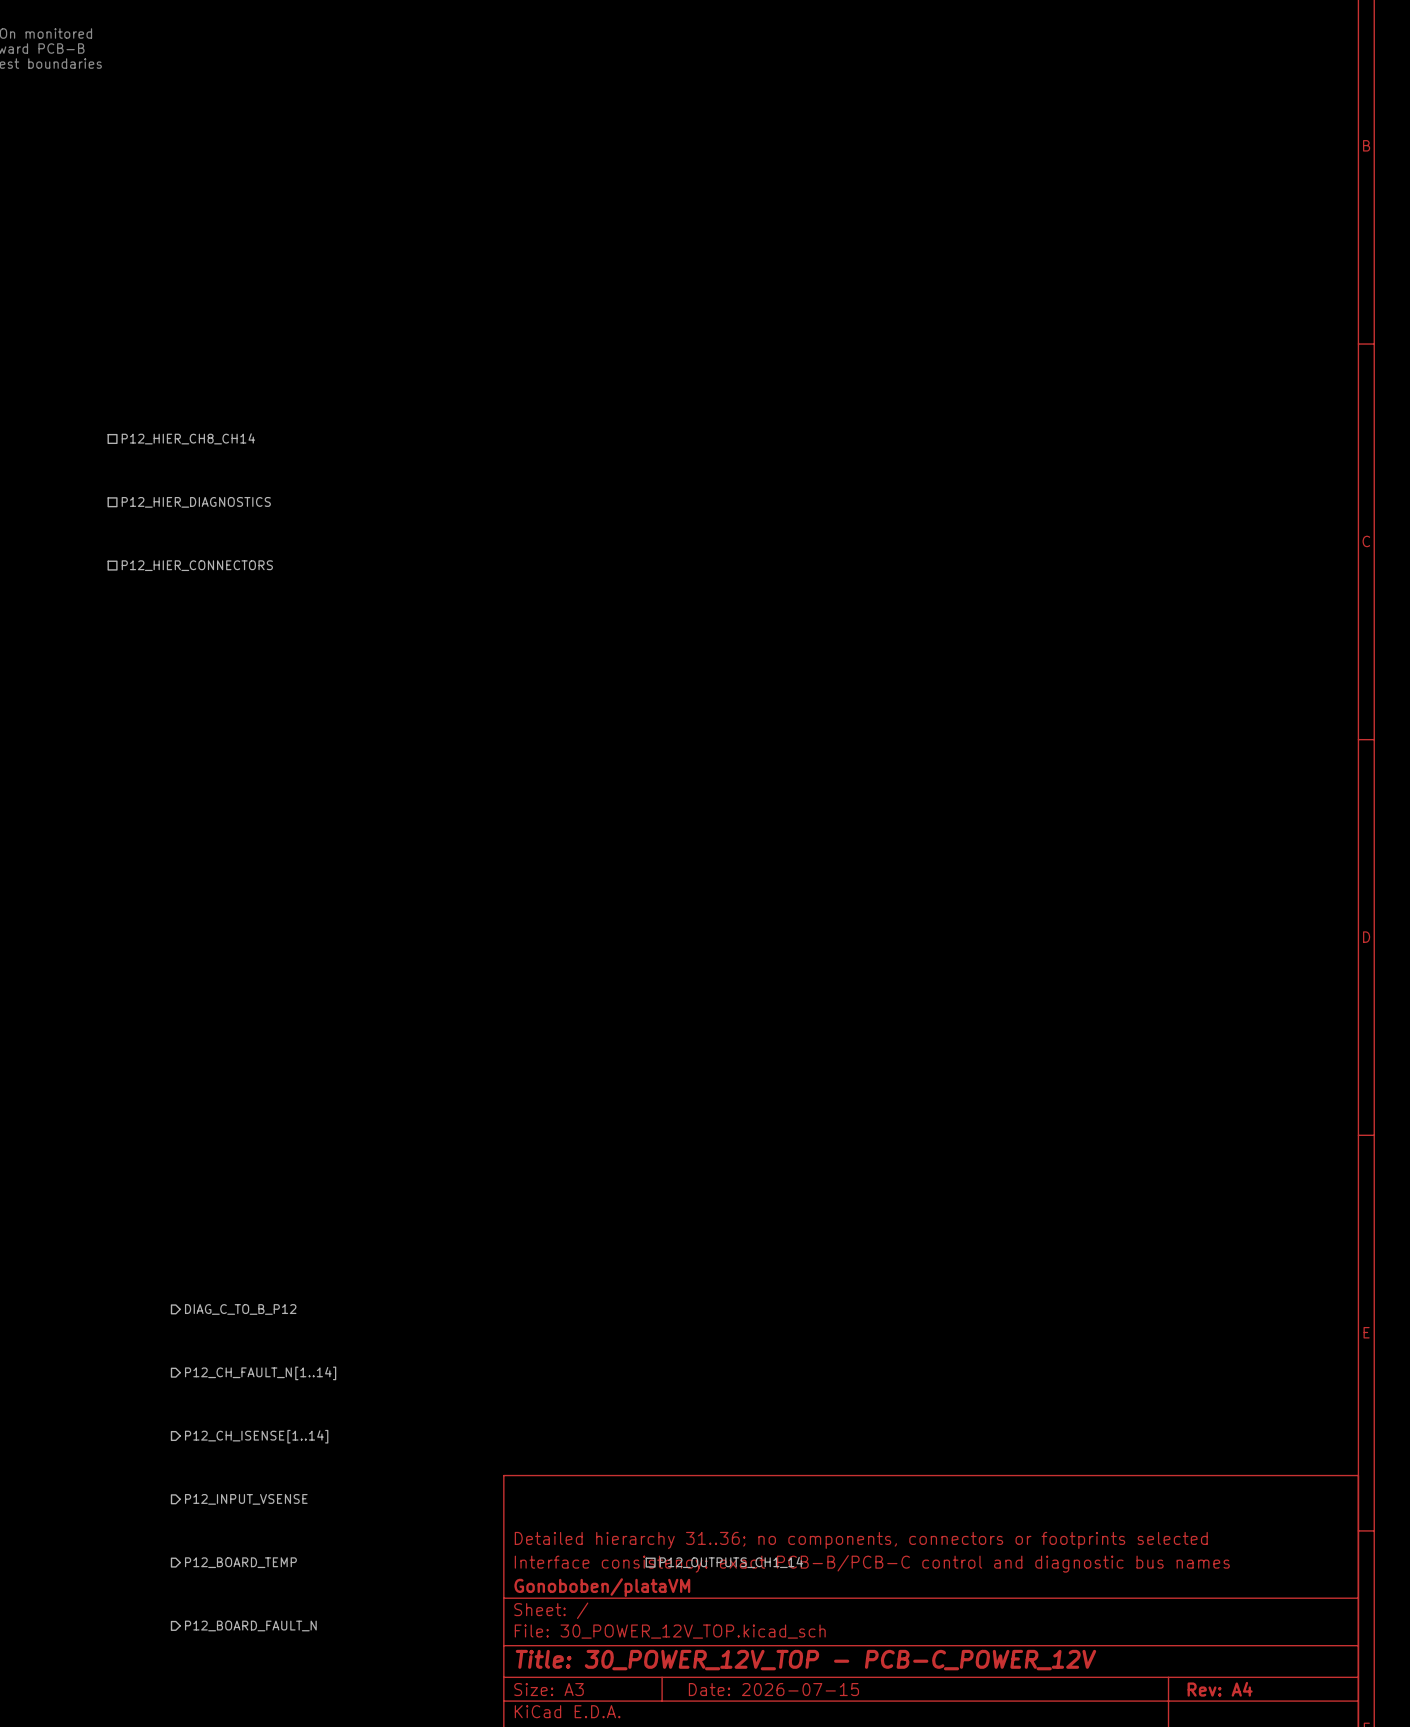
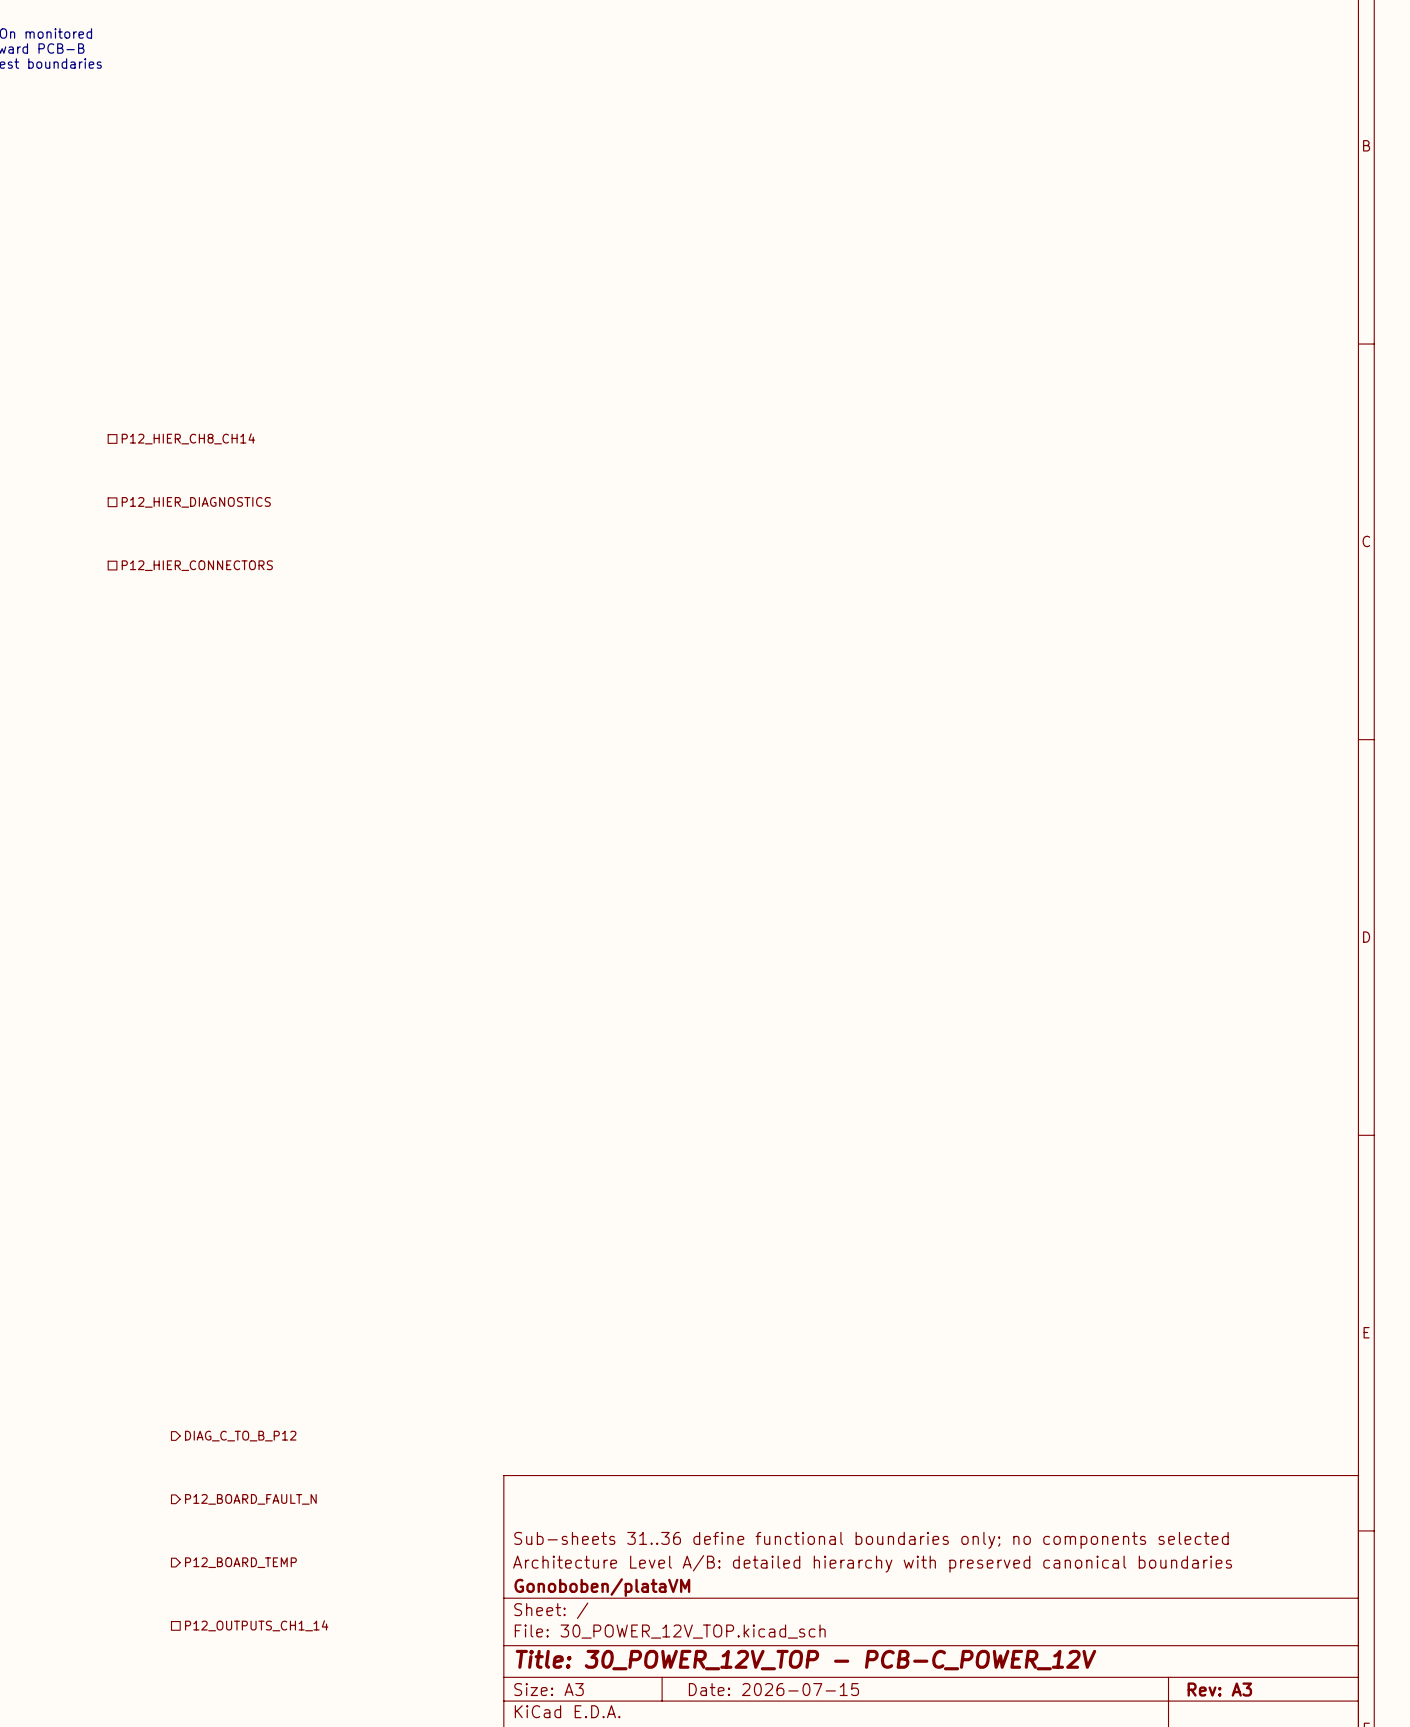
hierarchical label: DIAG_C_TO_B_P12 (240, 1309) -> none
hierarchical label: P12_CH_FAULT_N[1..14] (260, 1373) -> none
hierarchical label: P12_CH_ISENSE[1..14] (256, 1436) -> DIAG_C_TO_B_P12 (240, 1436)
hierarchical label: P12_INPUT_VSENSE (246, 1499) -> P12_BOARD_FAULT_N (250, 1499)
title block: Detailed hierarchy 31..36; no components, connectors or footprints selected (861, 1540) -> Sub-sheets 31..36 define functional boundaries only; no components selected (871, 1540)
hierarchical label: P12_OUTPUTS_CH1_14 (731, 1562) -> none
title block: Interface consistency: exact PCB-B/PCB-C control and diagnostic bus names (872, 1563) -> Architecture Level A/B: detailed hierarchy with preserved canonical boundaries (872, 1563)
hierarchical label shape: output (250, 1625) -> passive (256, 1625)
hierarchical label: P12_BOARD_FAULT_N (250, 1625) -> P12_OUTPUTS_CH1_14 (256, 1625)
title block: Rev: A4 (1220, 1689) -> Rev: A3 (1219, 1689)

